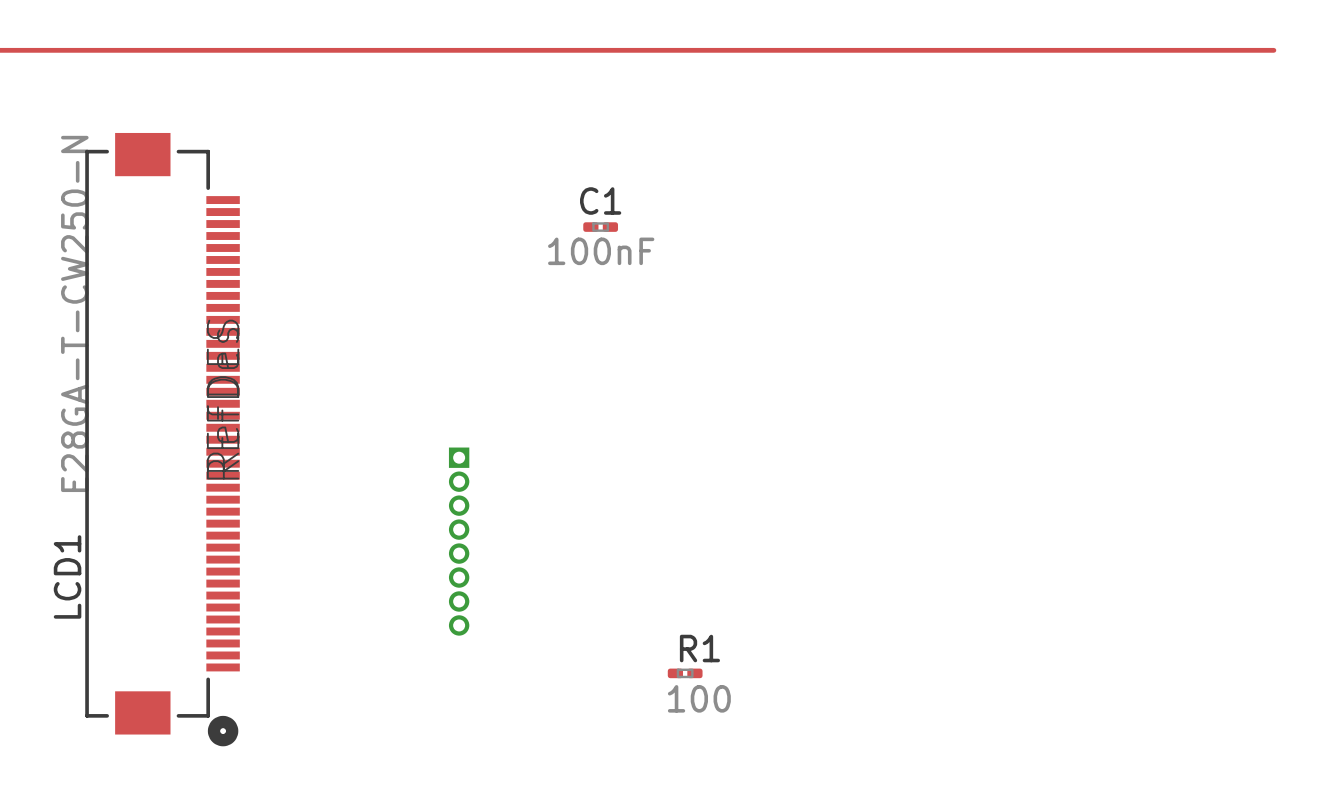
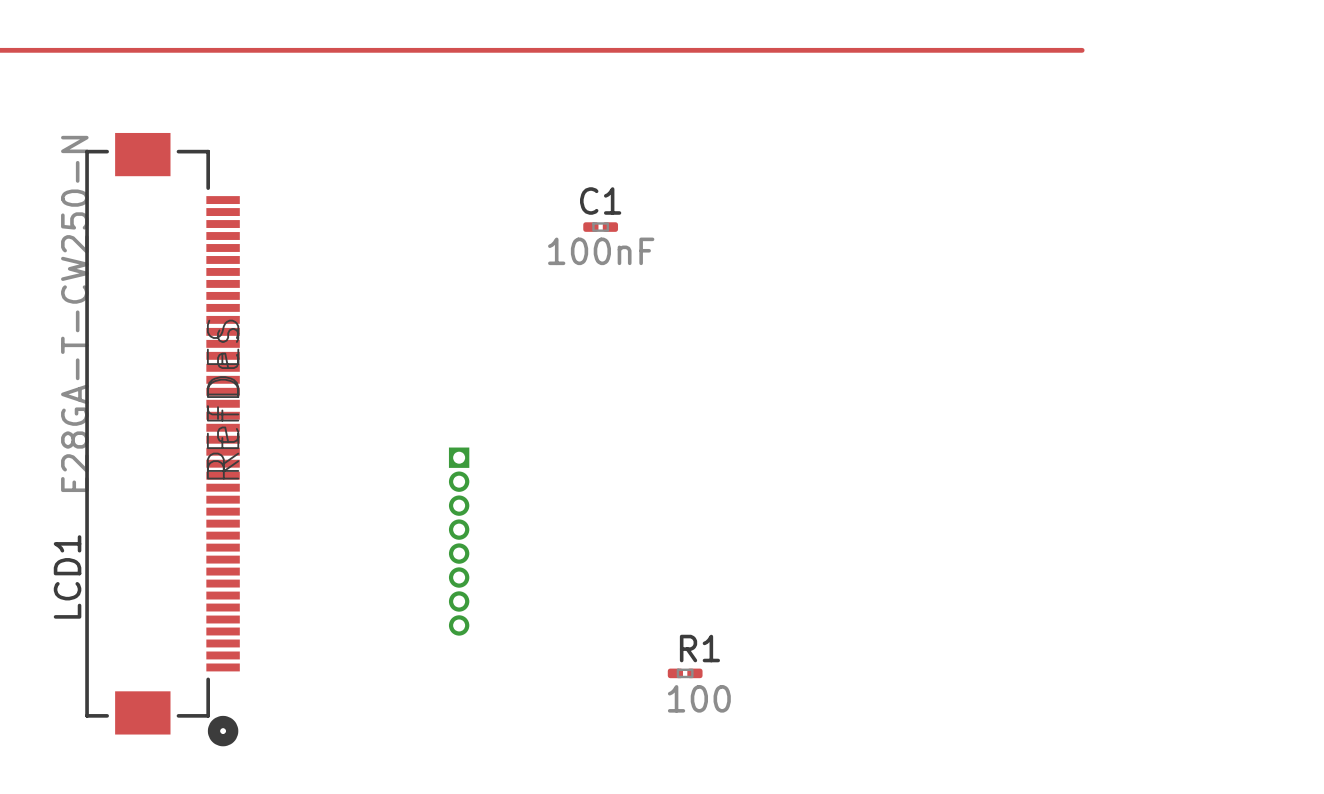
track: (1082, 50) (1273, 50) -> none

